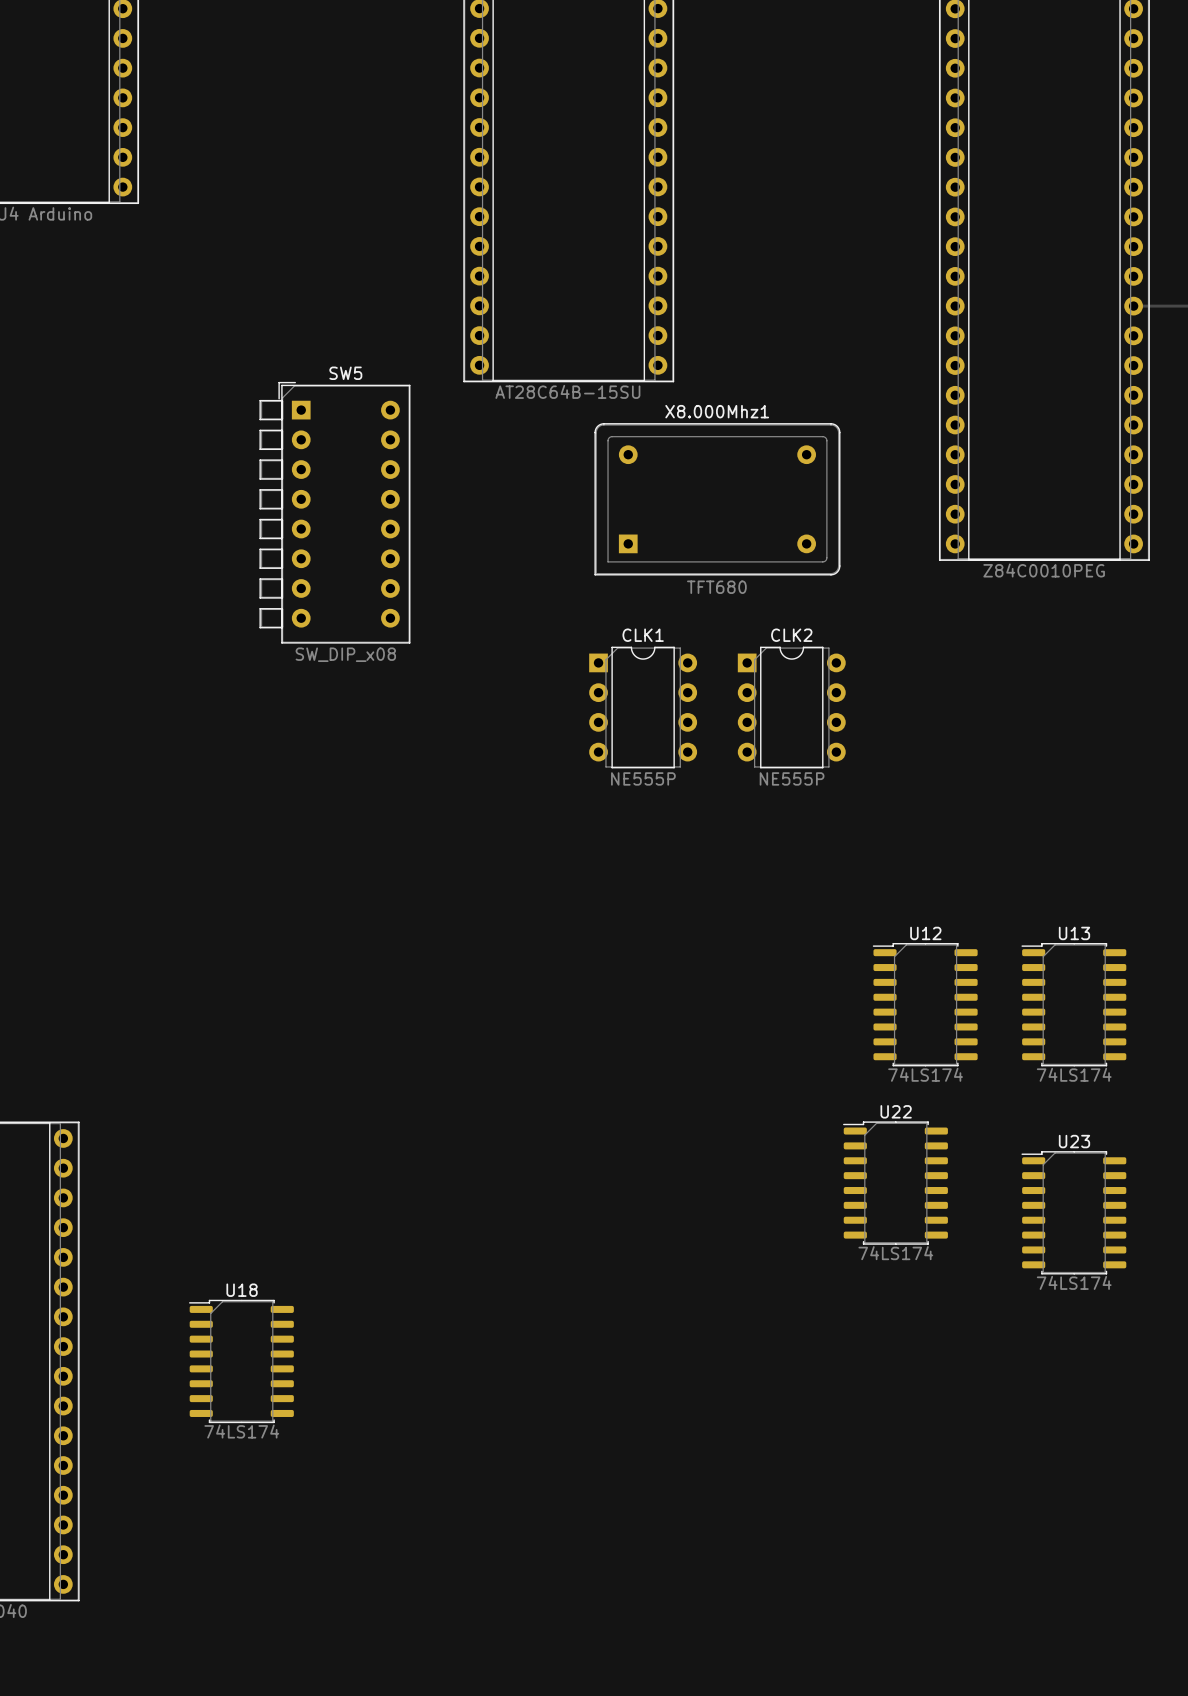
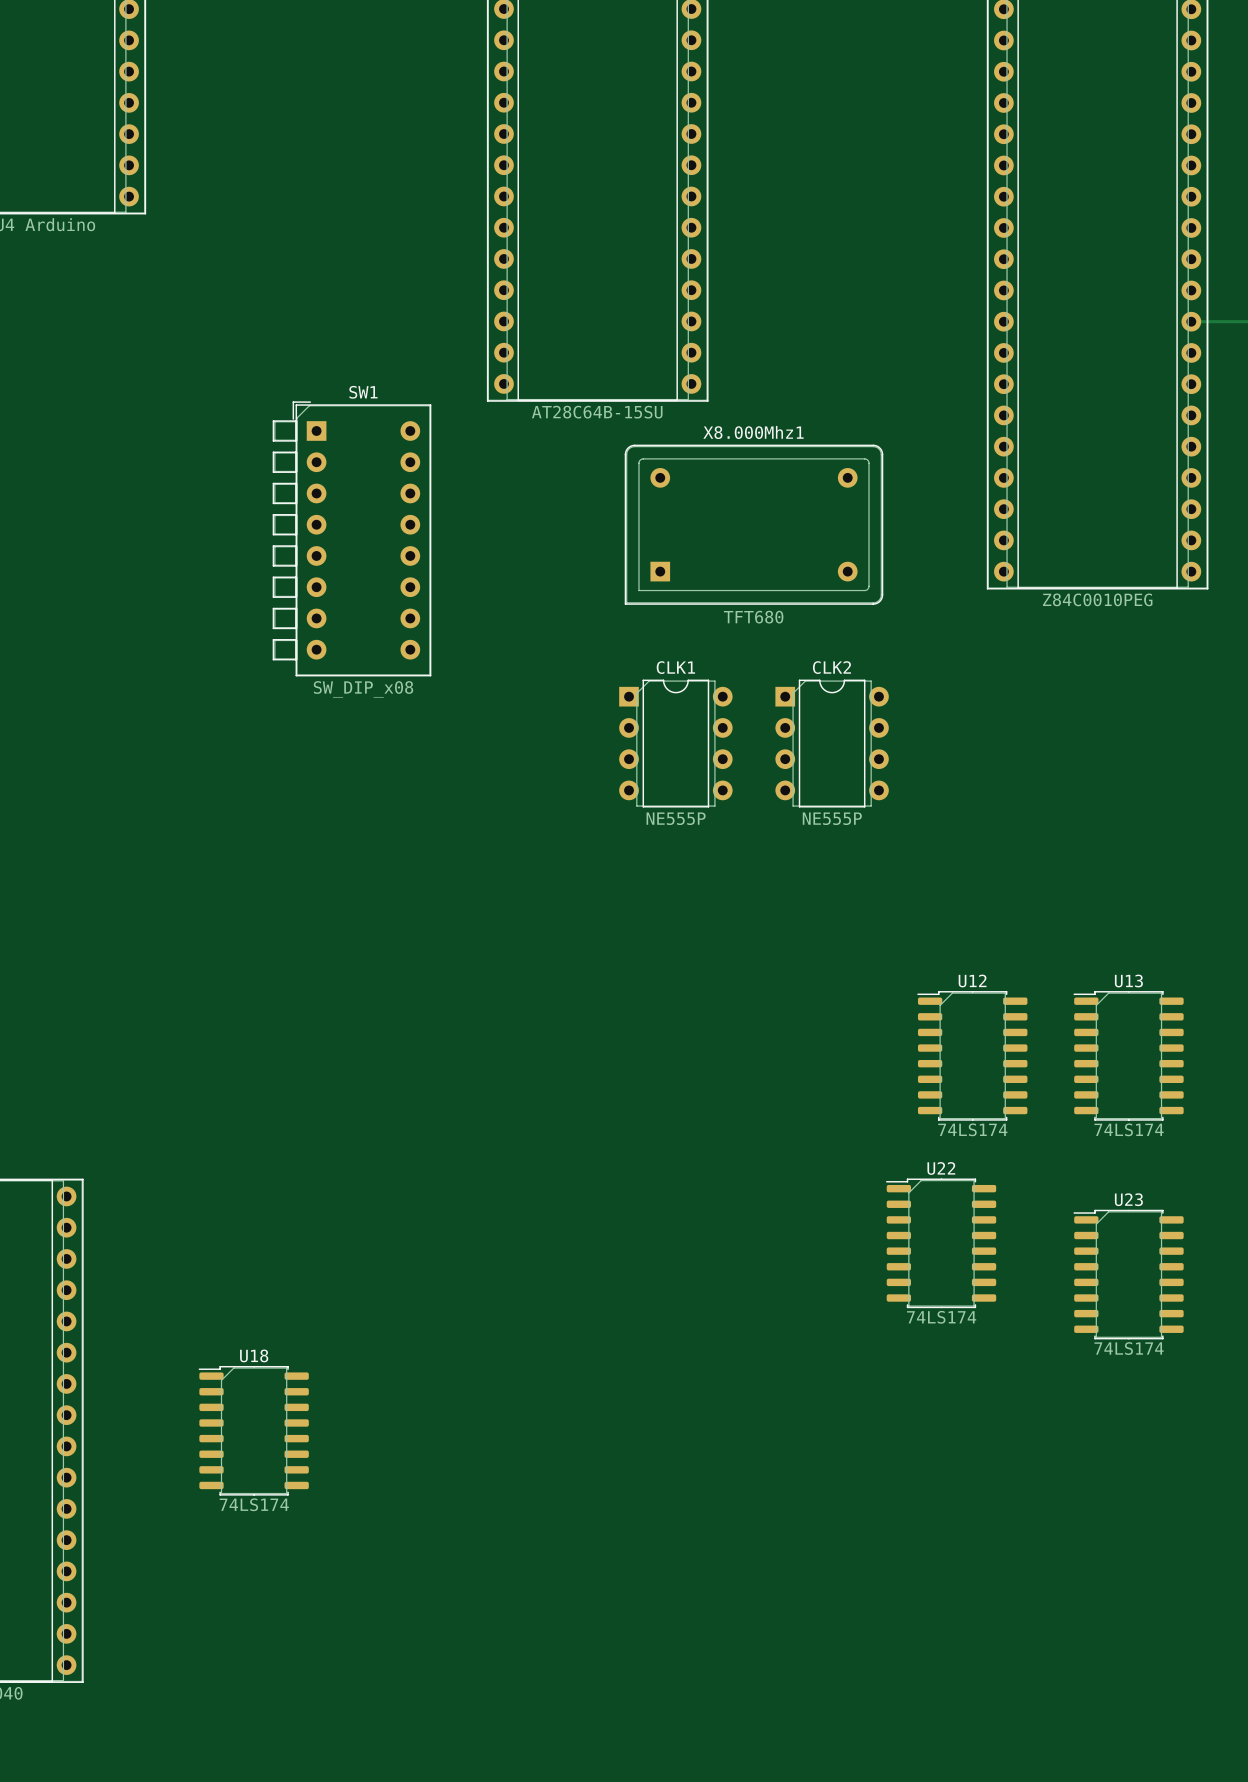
SW5 name: SW5 (345, 373) -> SW1 (363, 392)

